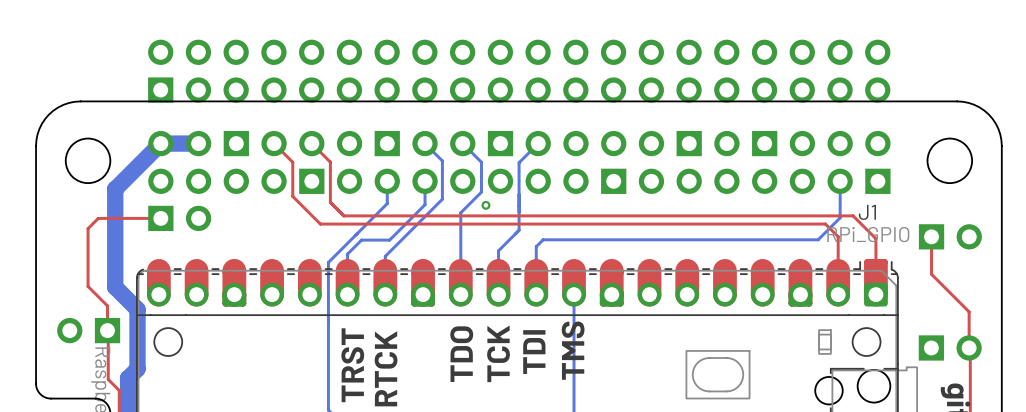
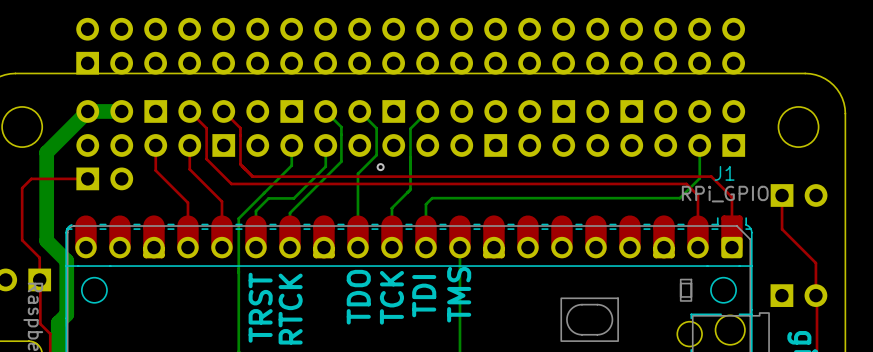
top track: none -> (155, 145) (155, 170) (187, 202) (187, 247)
top track: none -> (189, 145) (189, 169) (221, 201) (221, 247)

